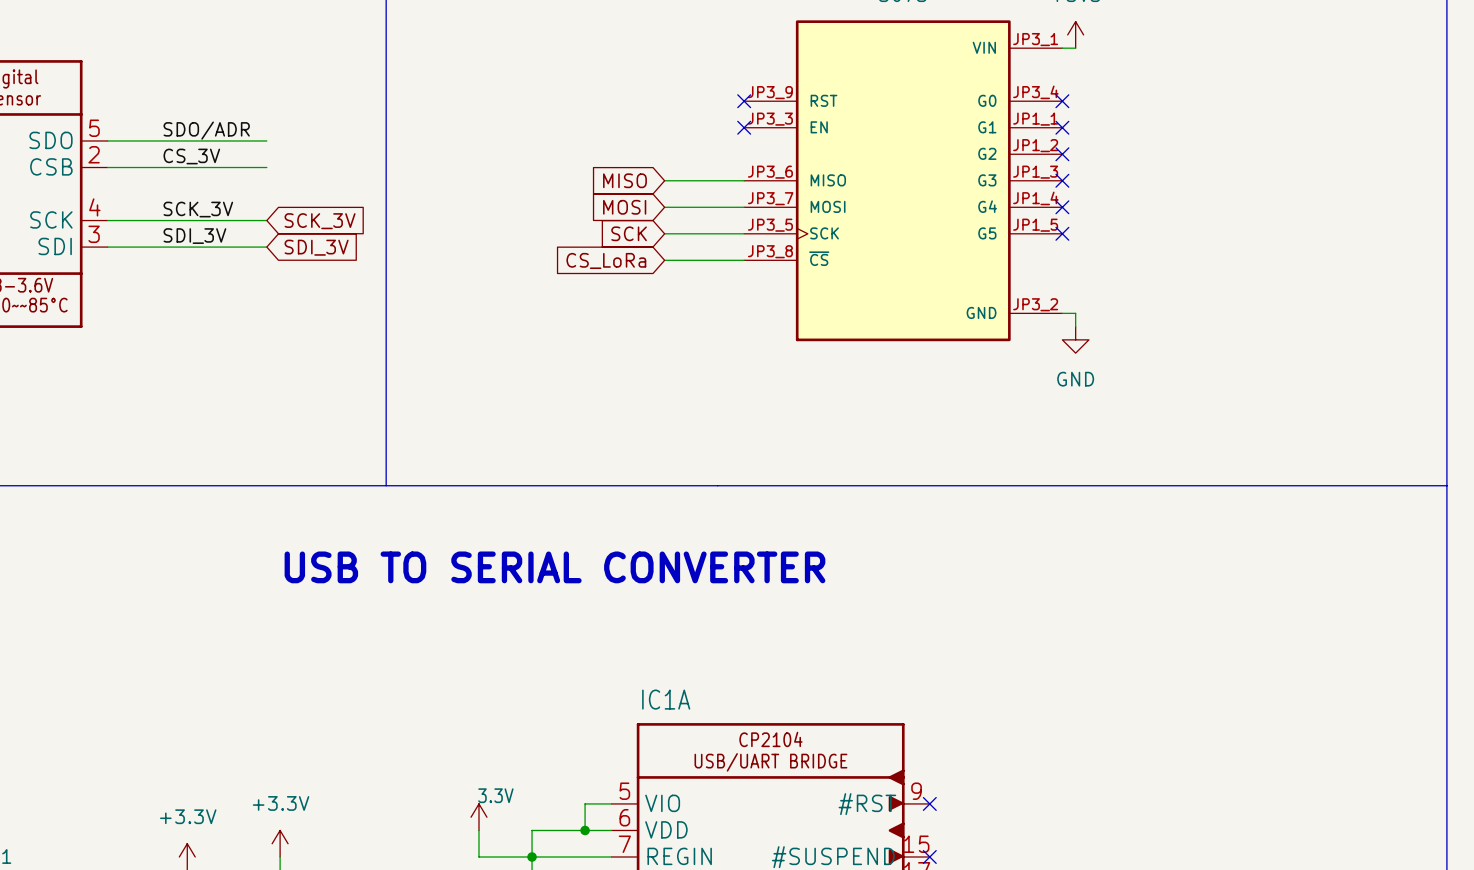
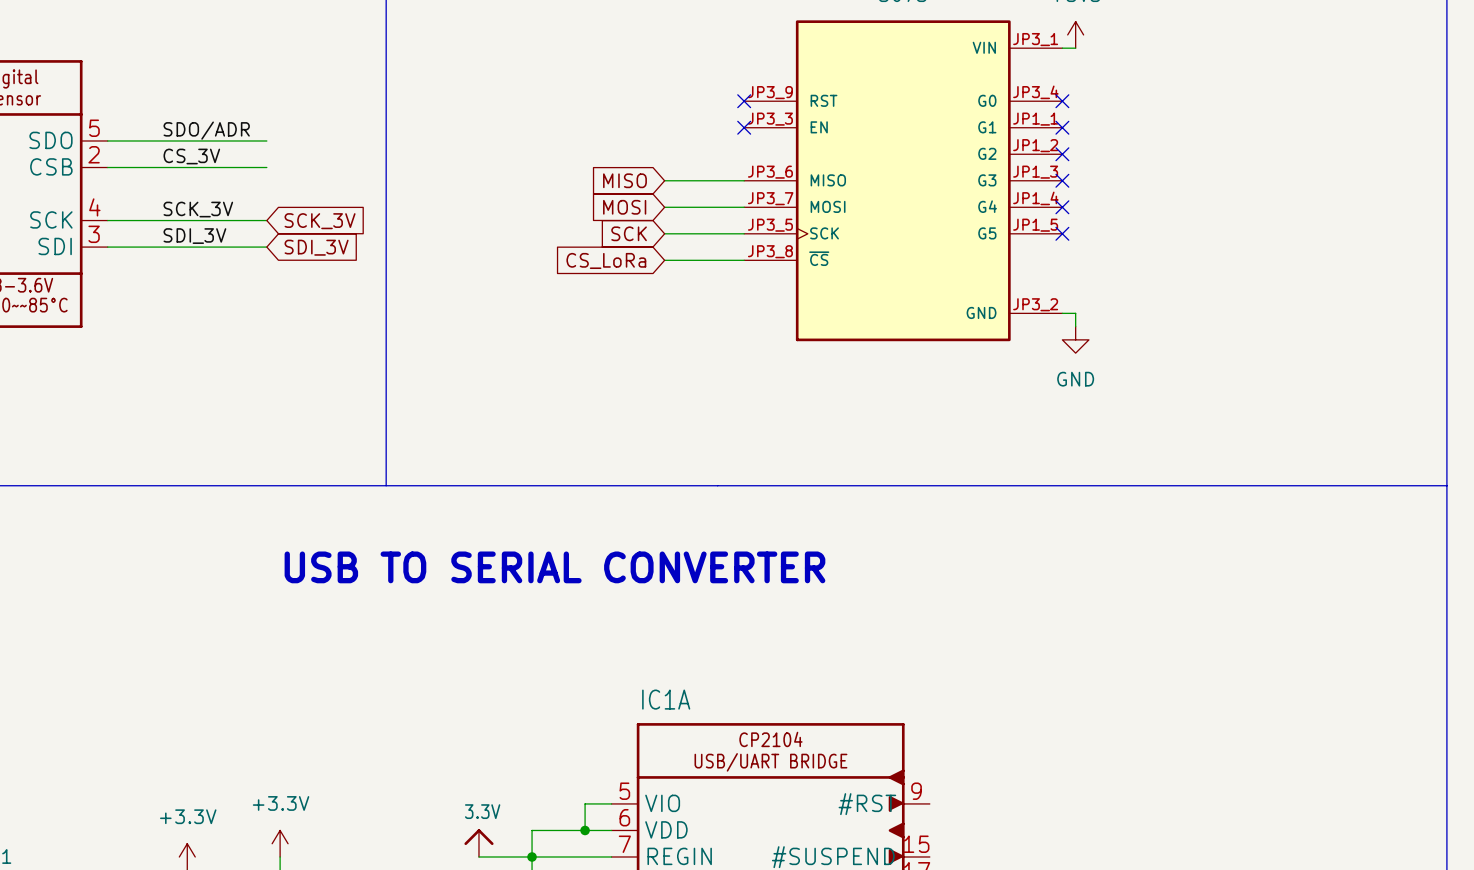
no-connect mark: (929, 803) -> none
power symbol: 3.3V (478, 817) -> none
power symbol: none -> 3.3V (478, 843)
no-connect mark: (929, 856) -> none

